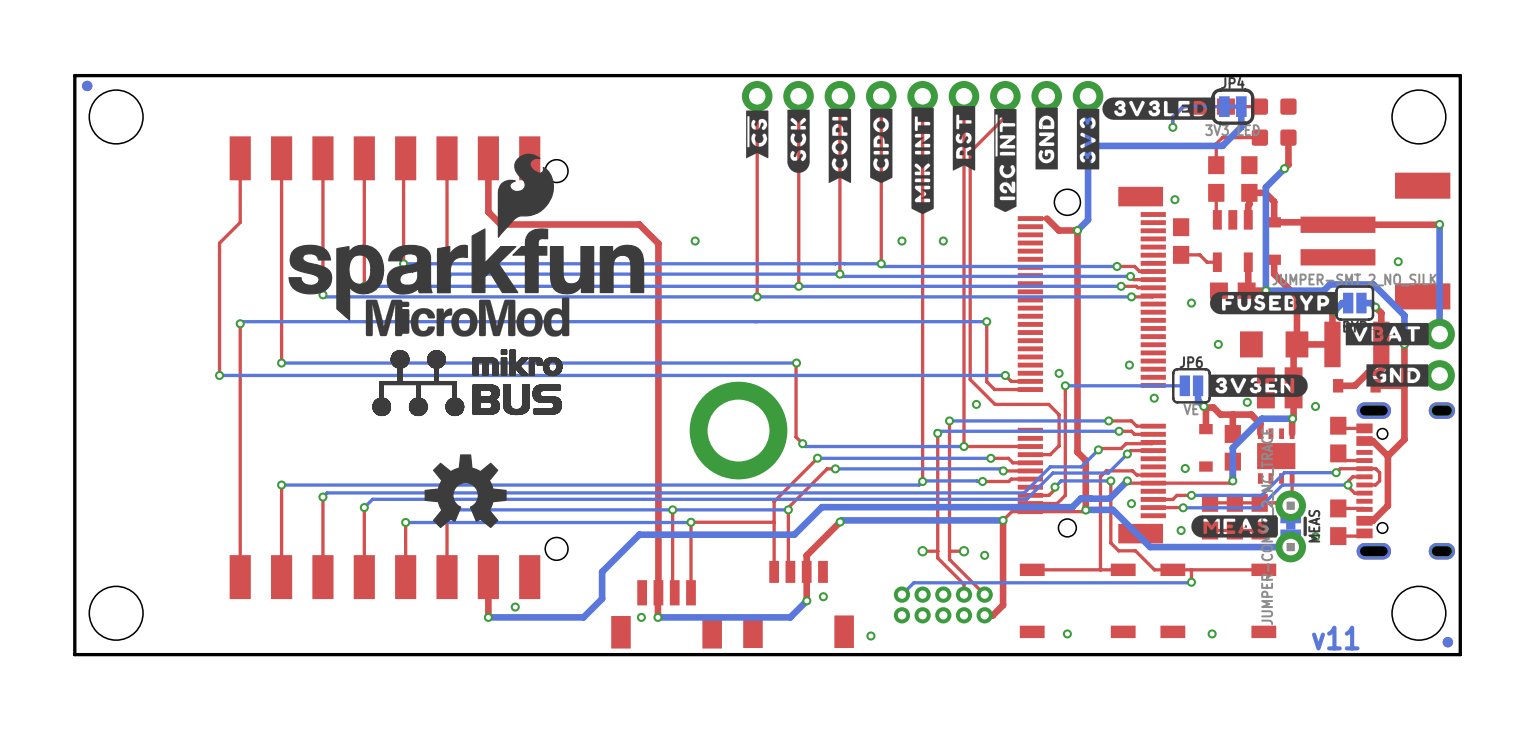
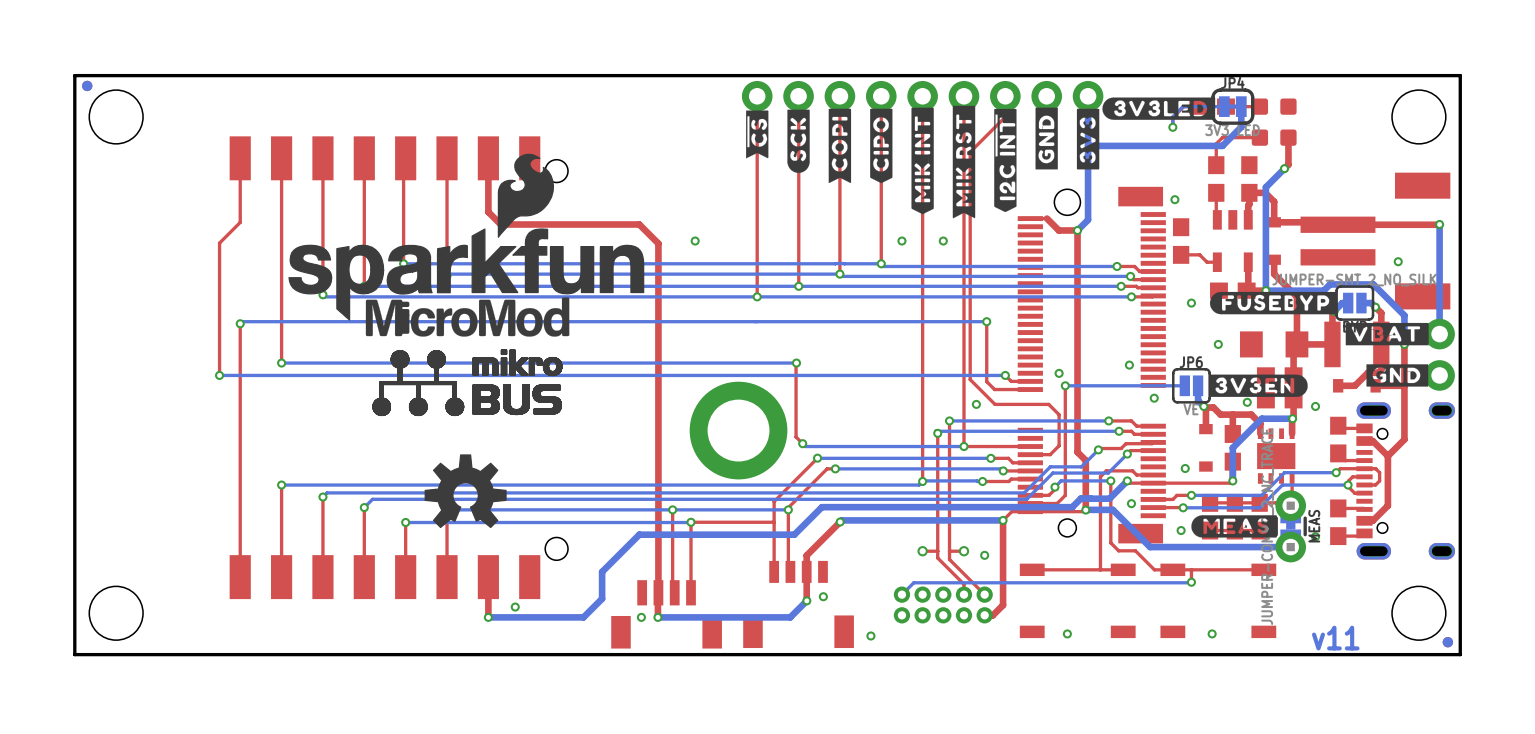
drawing: none -> [952, 105, 976, 219]
drawing: [952, 106, 976, 171] -> none

